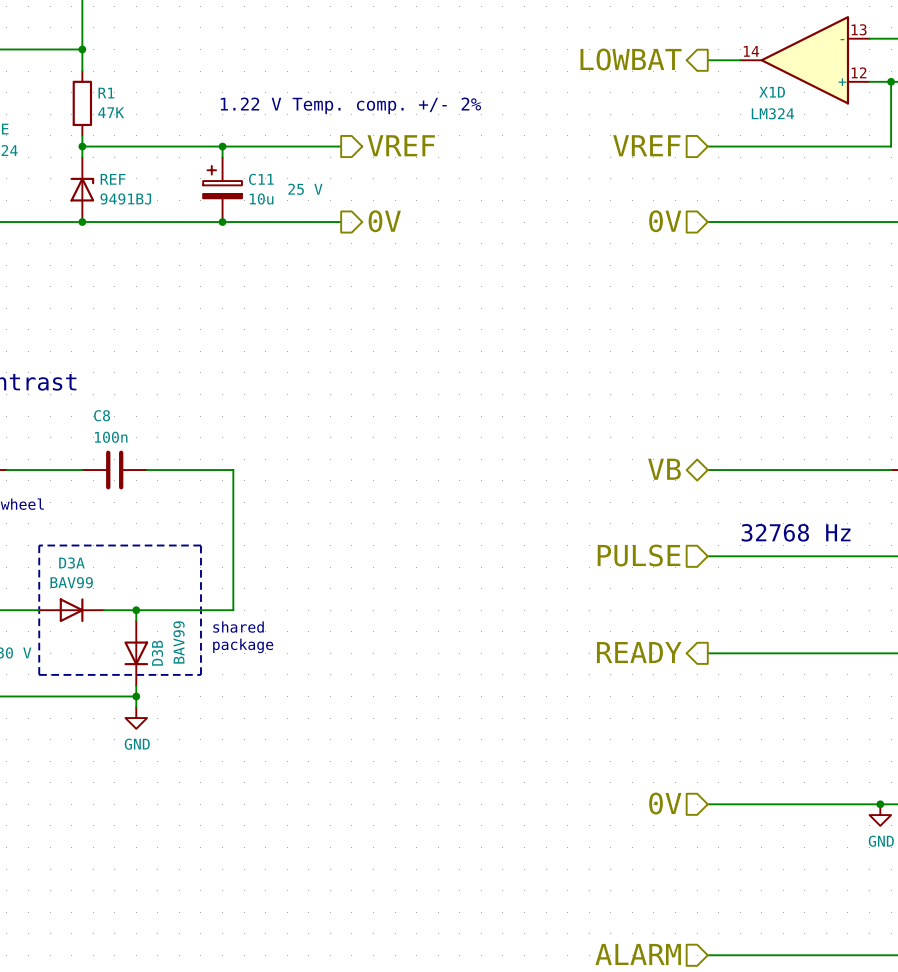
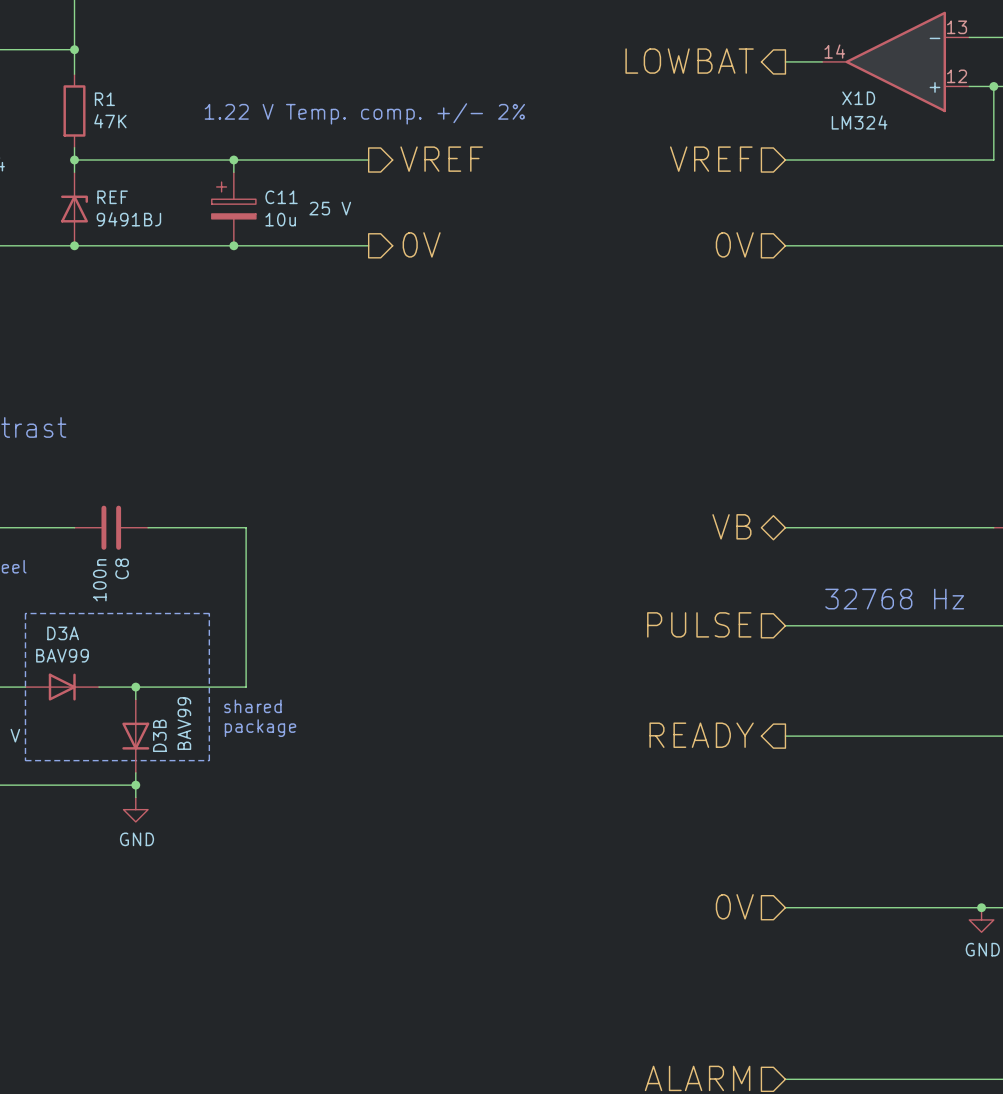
C8 name rotation: 0° (102, 415) -> 90° counterclockwise (122, 568)
C8 name position: C8 (102, 415) -> C8 (122, 568)
C8 value rotation: 0° (111, 437) -> 90° counterclockwise (99, 580)
C8 value position: 100n (111, 437) -> 100n (99, 580)

